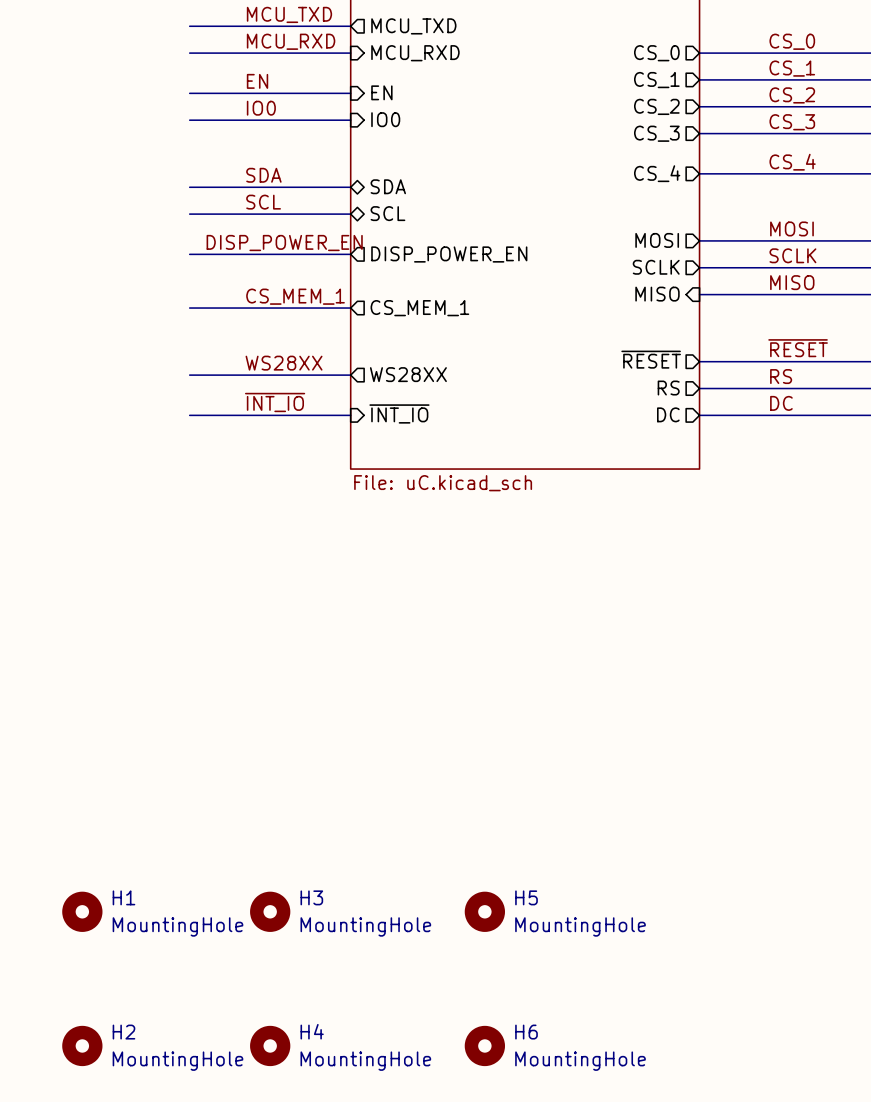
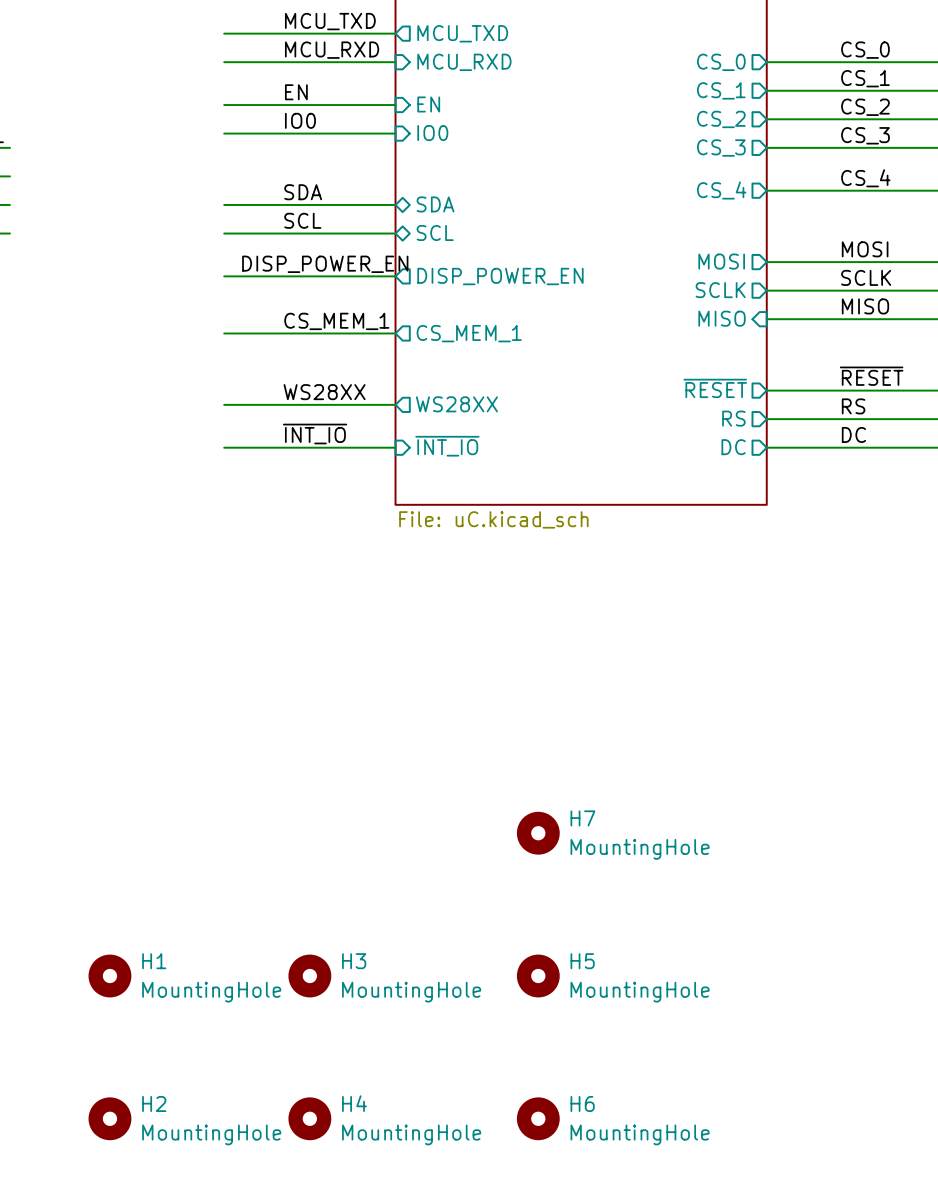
H7: none -> MountingHole (538, 833)

